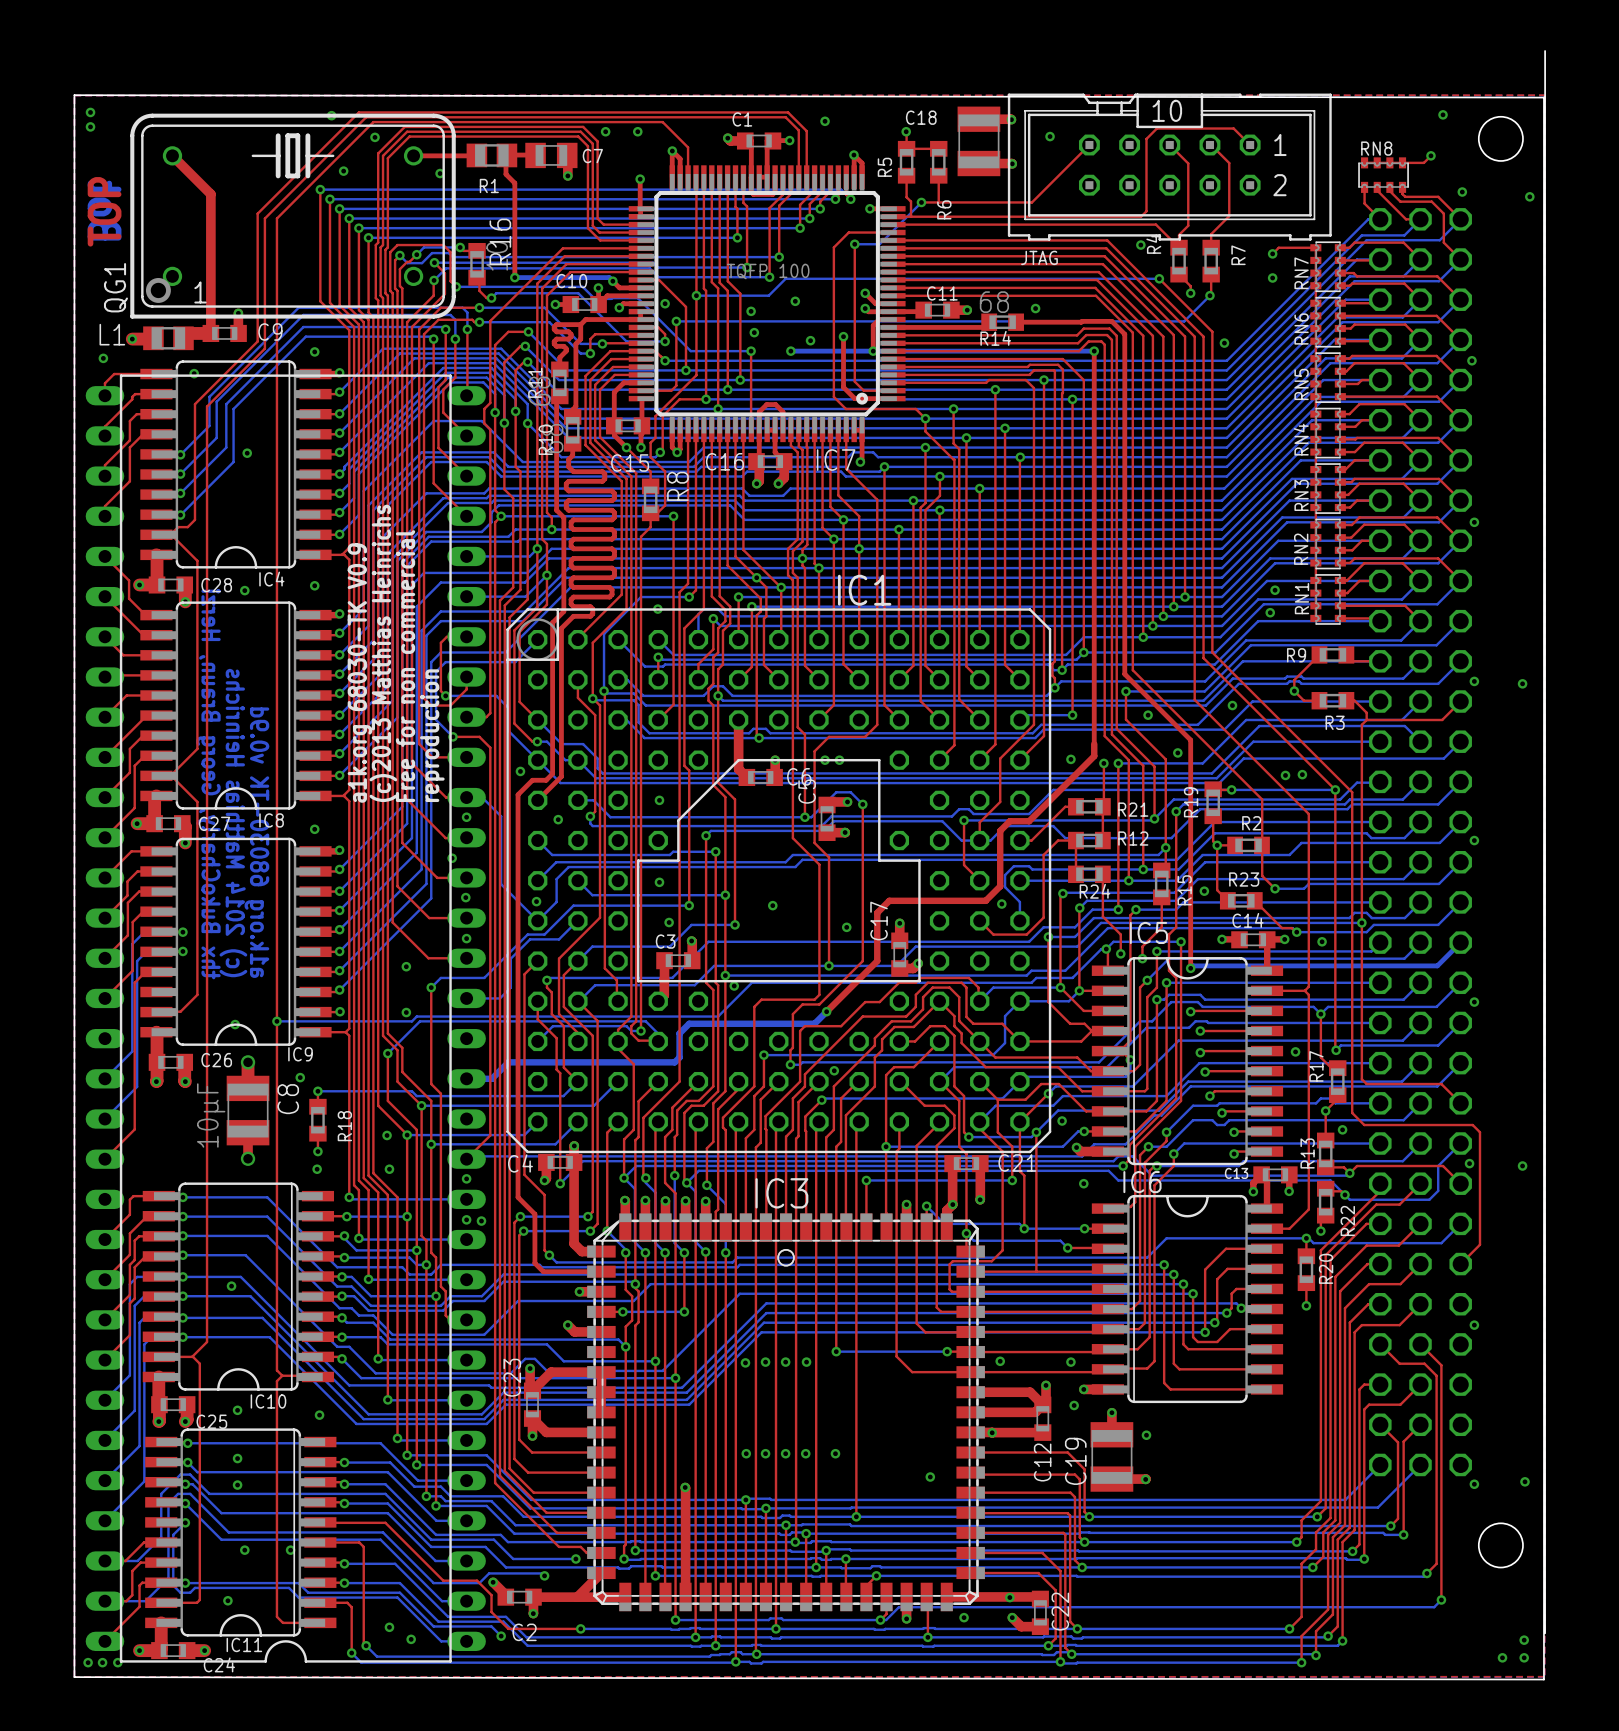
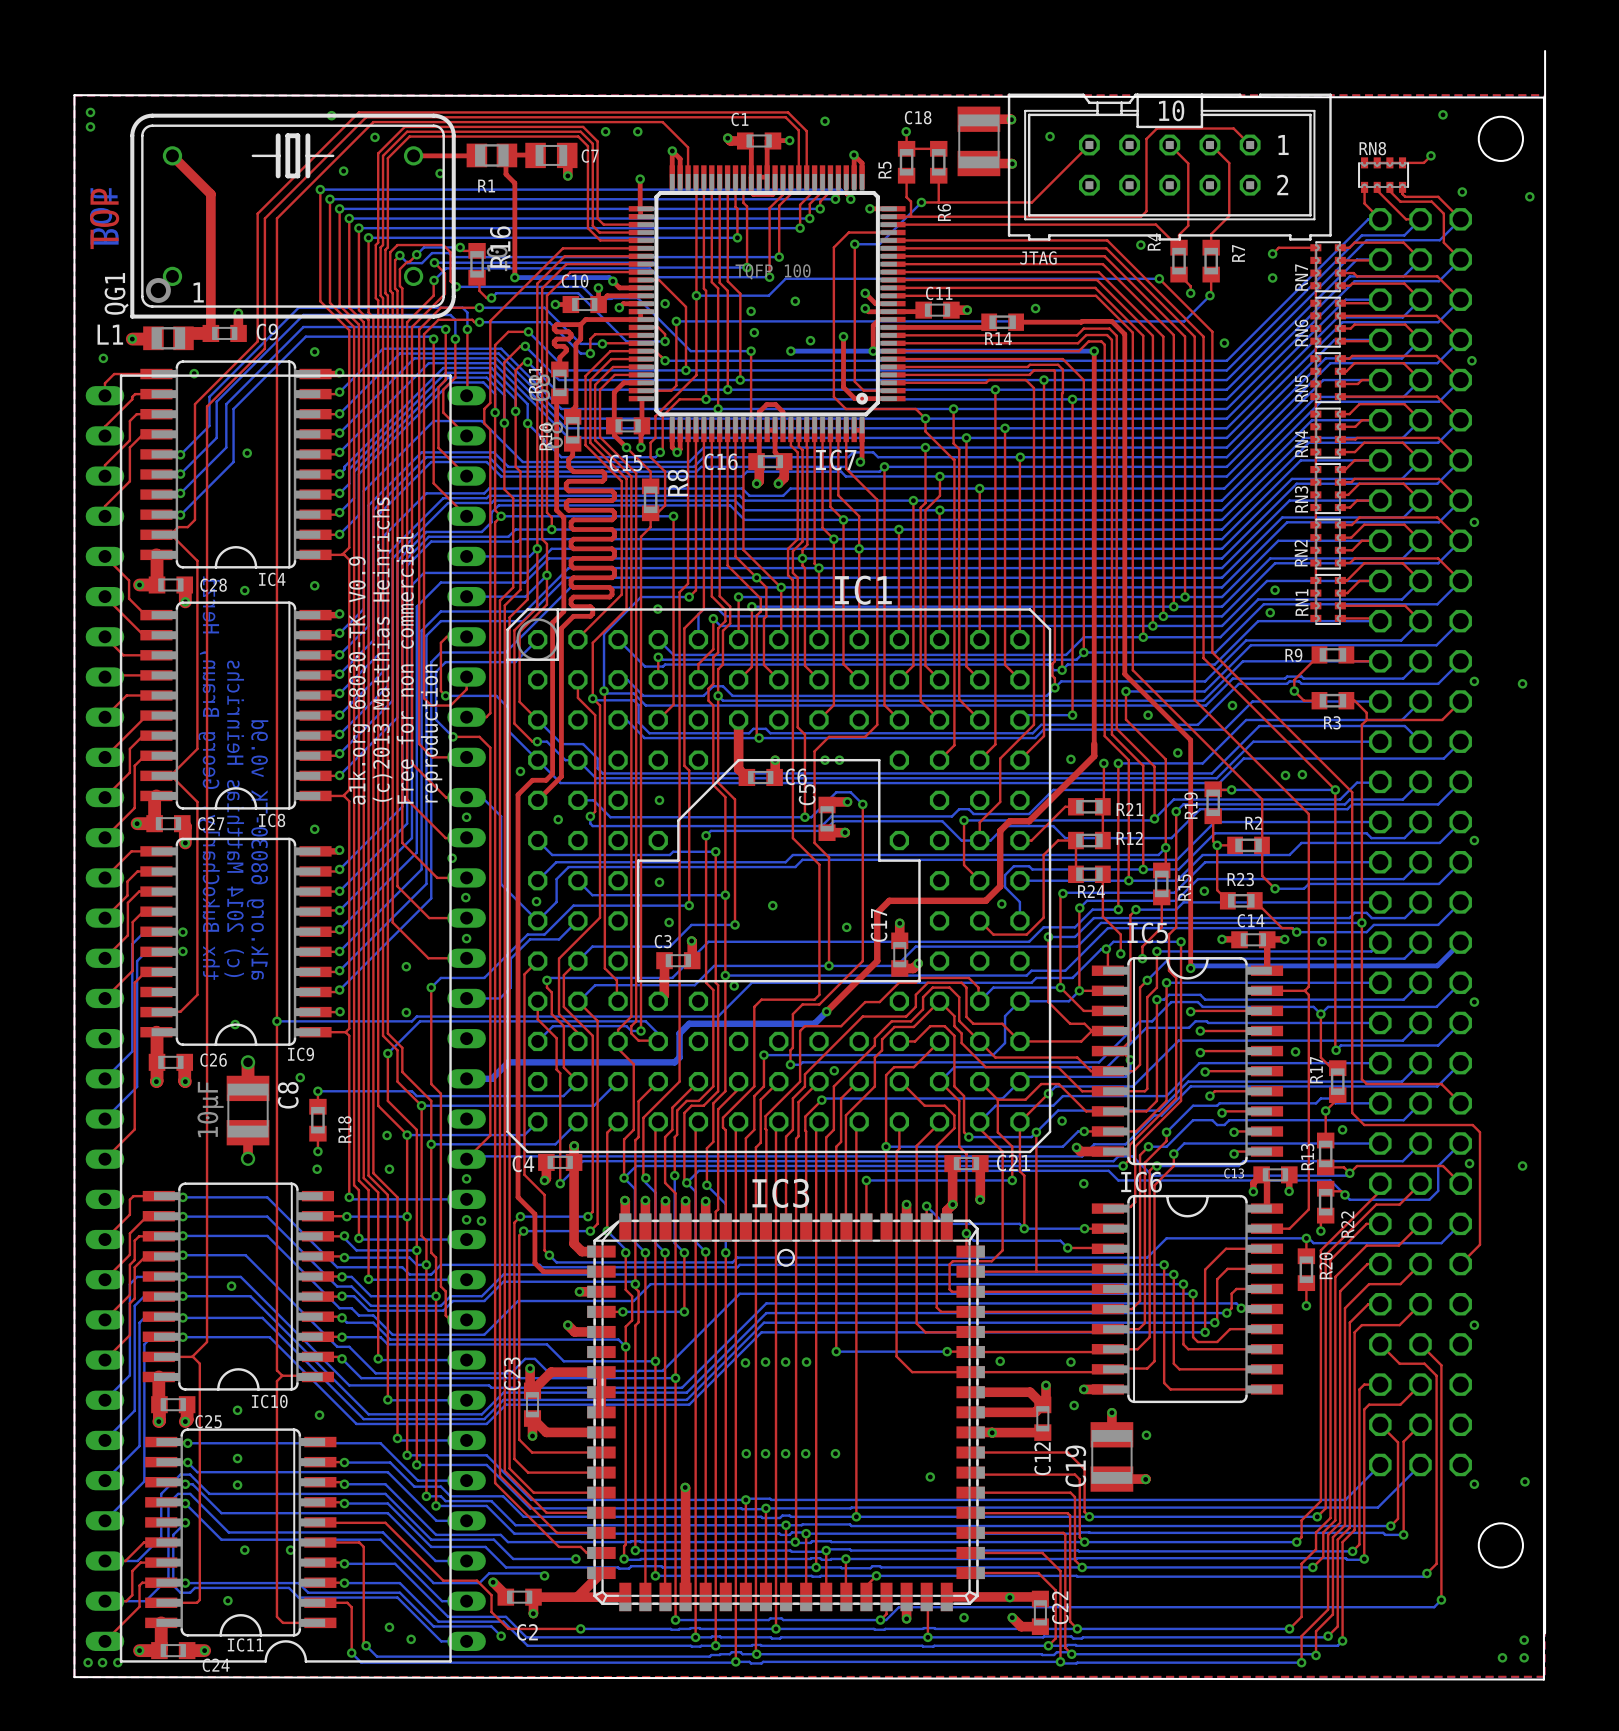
R14 value: 68 (994, 302) -> none

